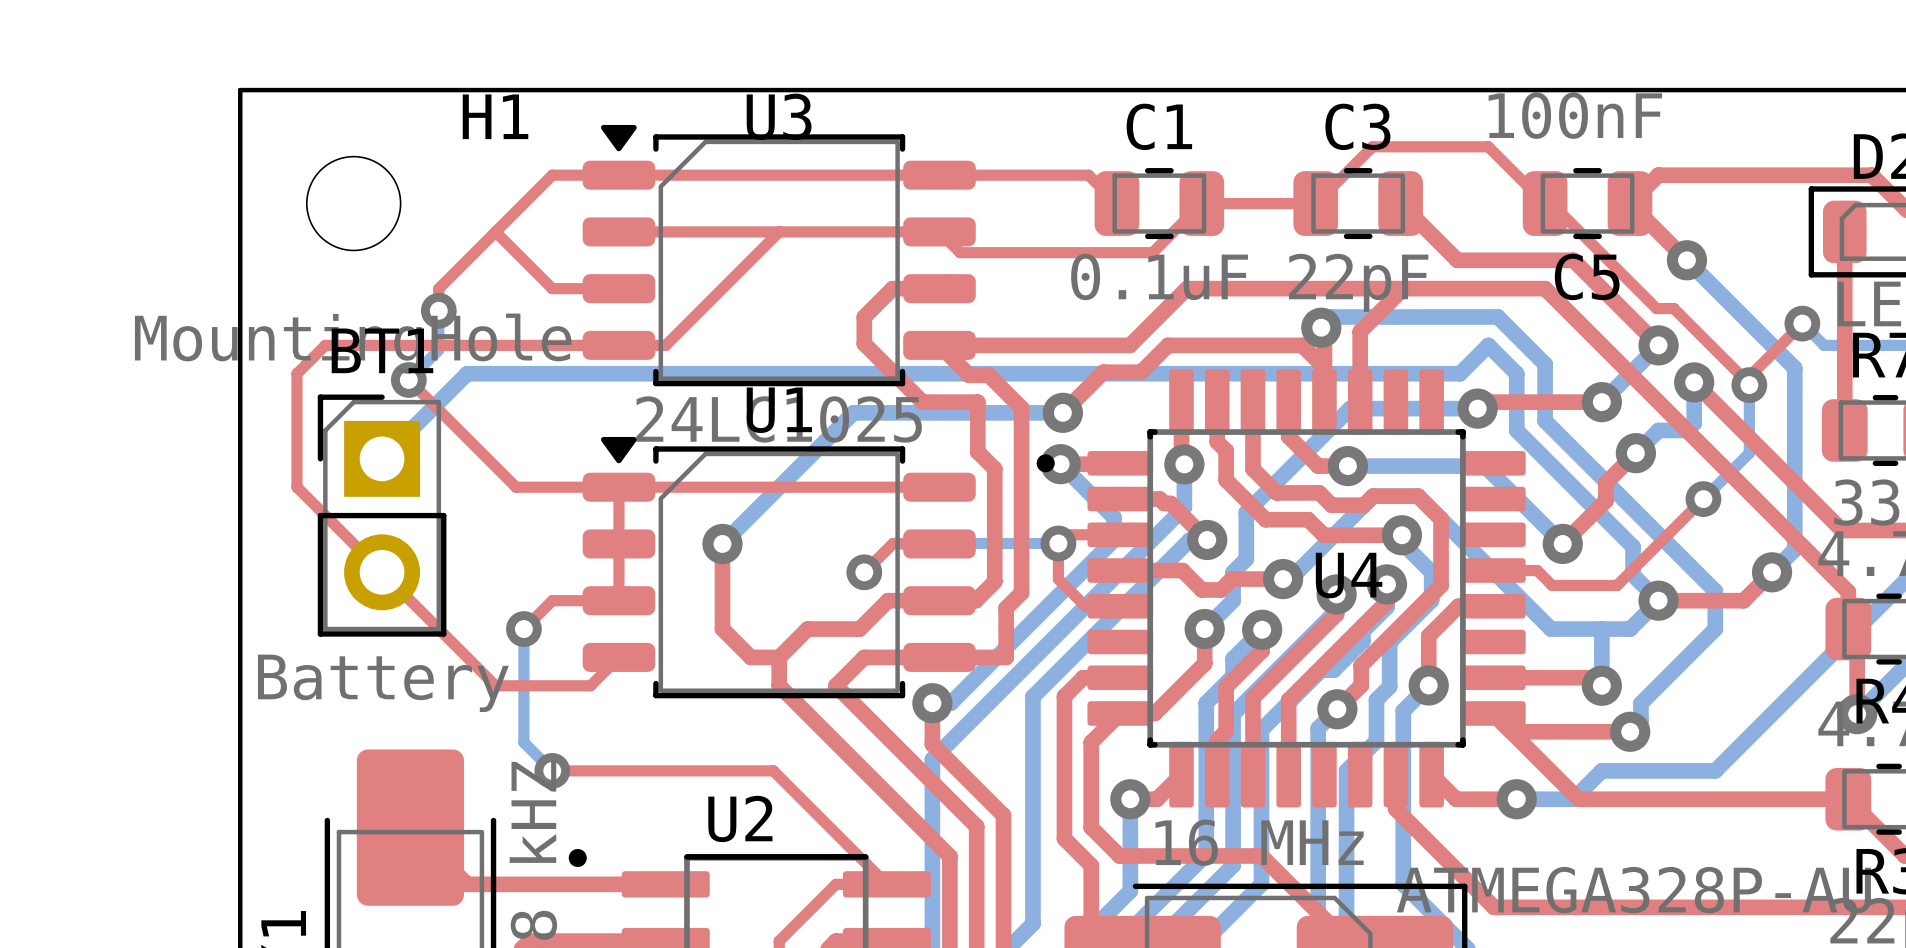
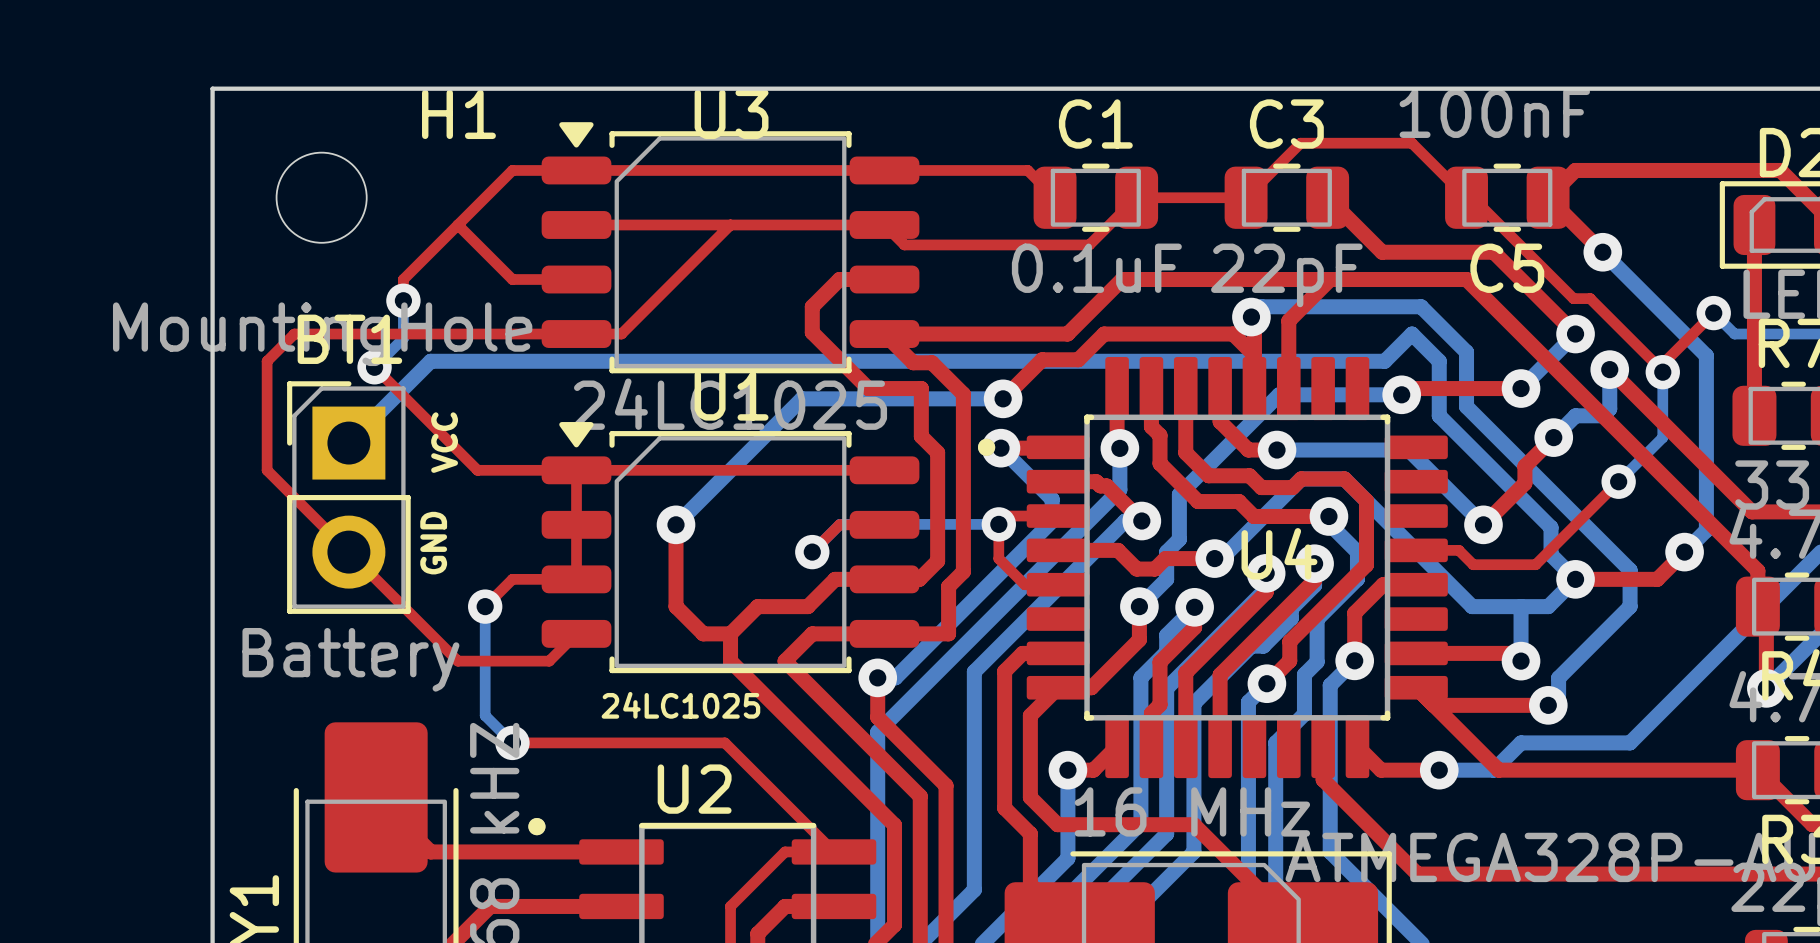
text: none -> VCC (444, 442)
text: none -> GND (433, 543)
U1 value: none -> 24LC1025 (680, 705)

